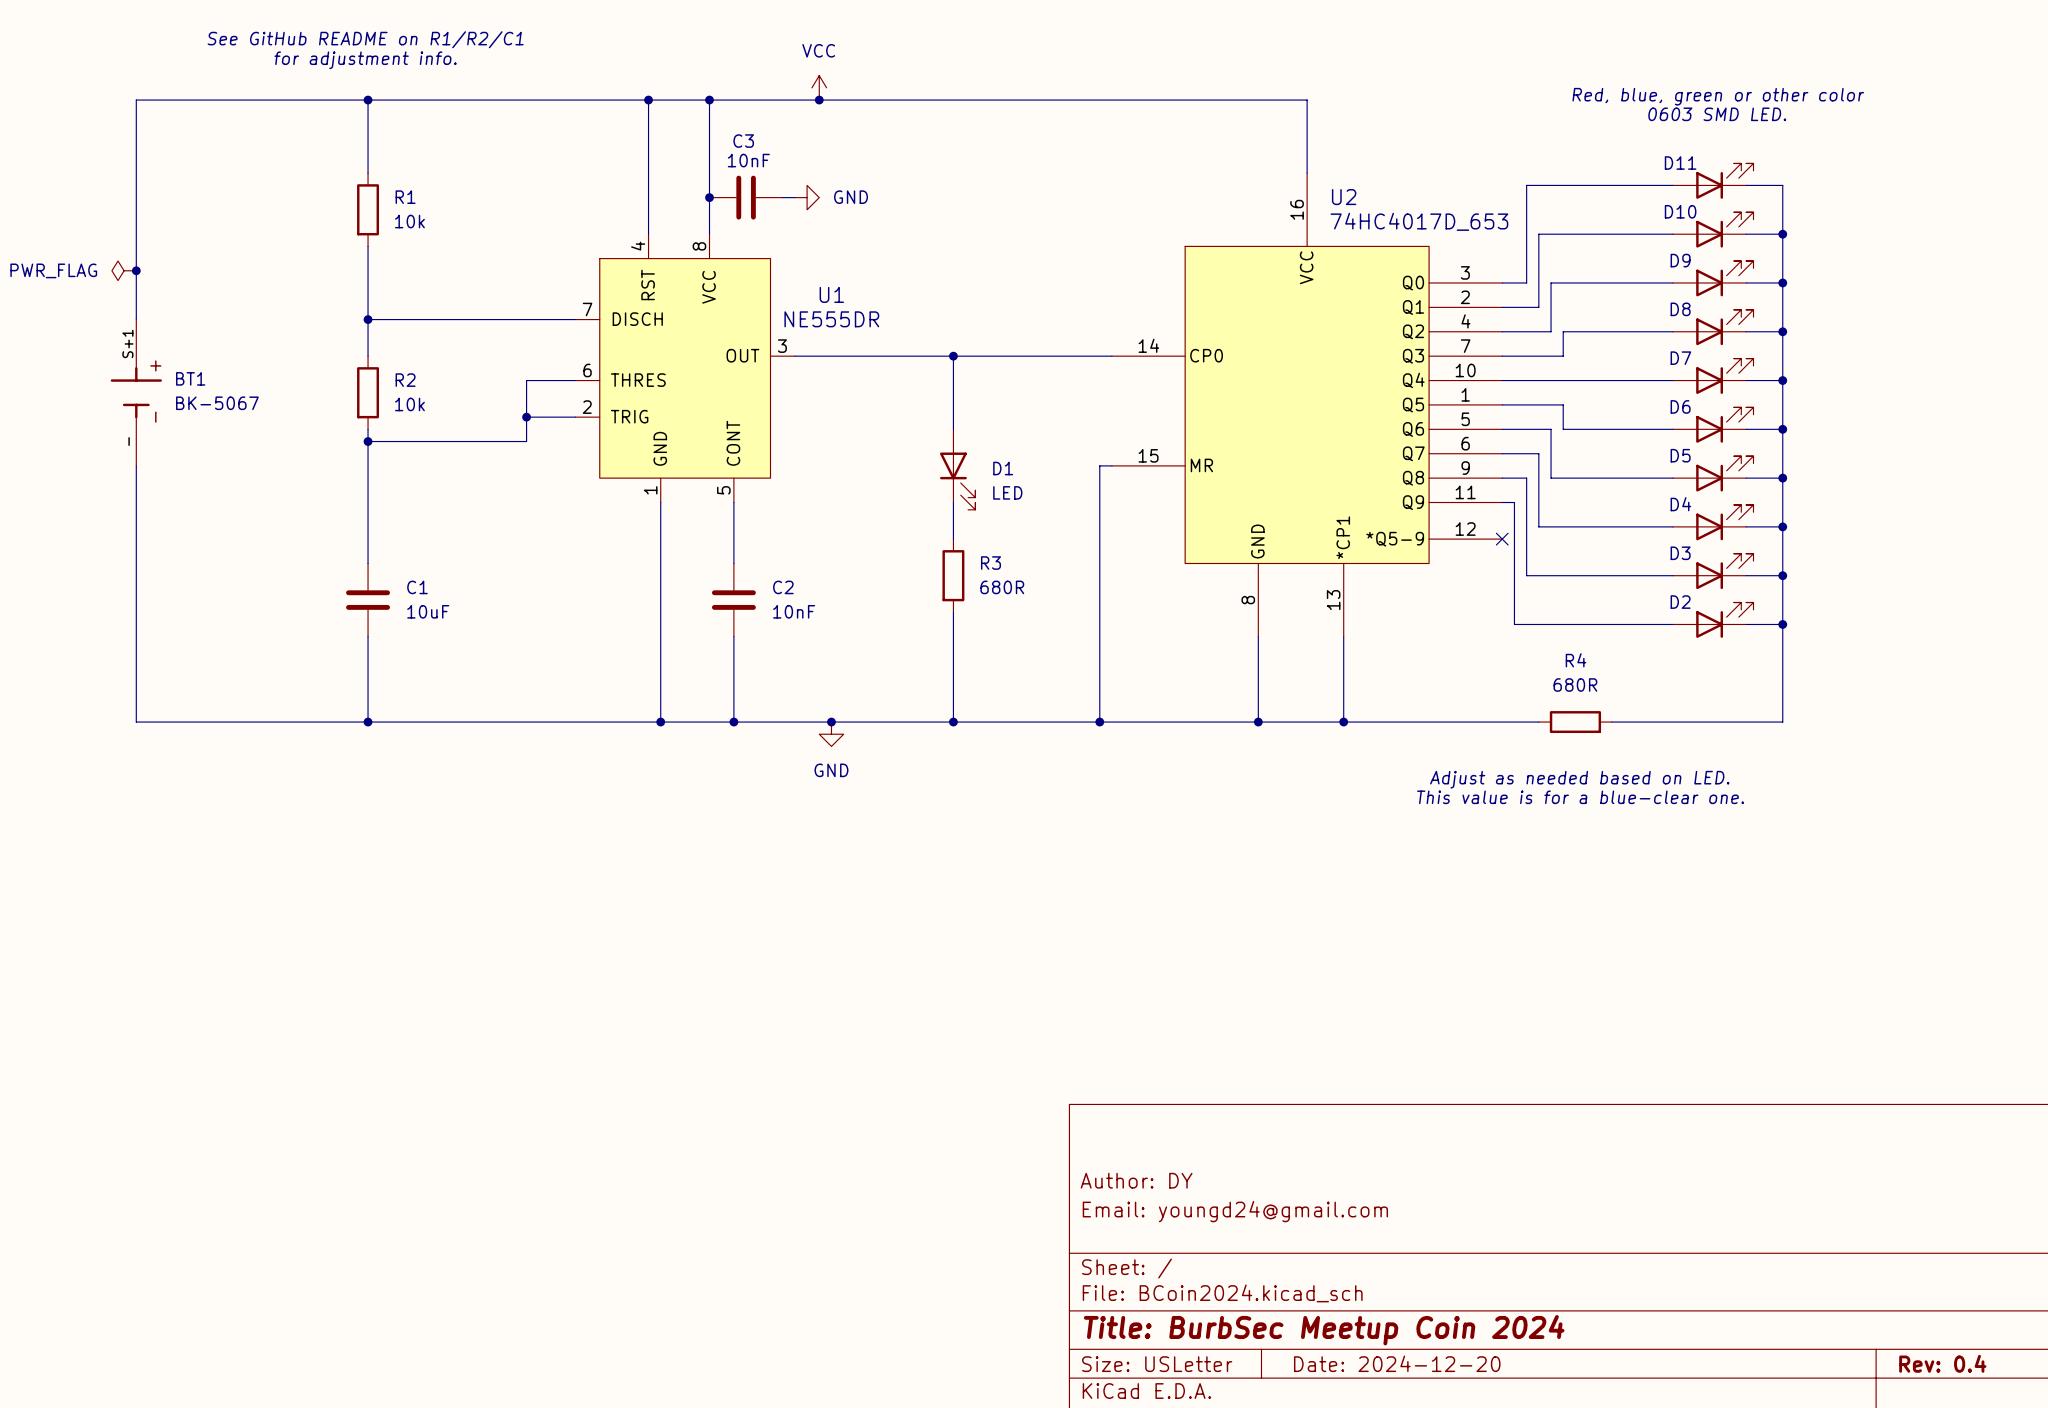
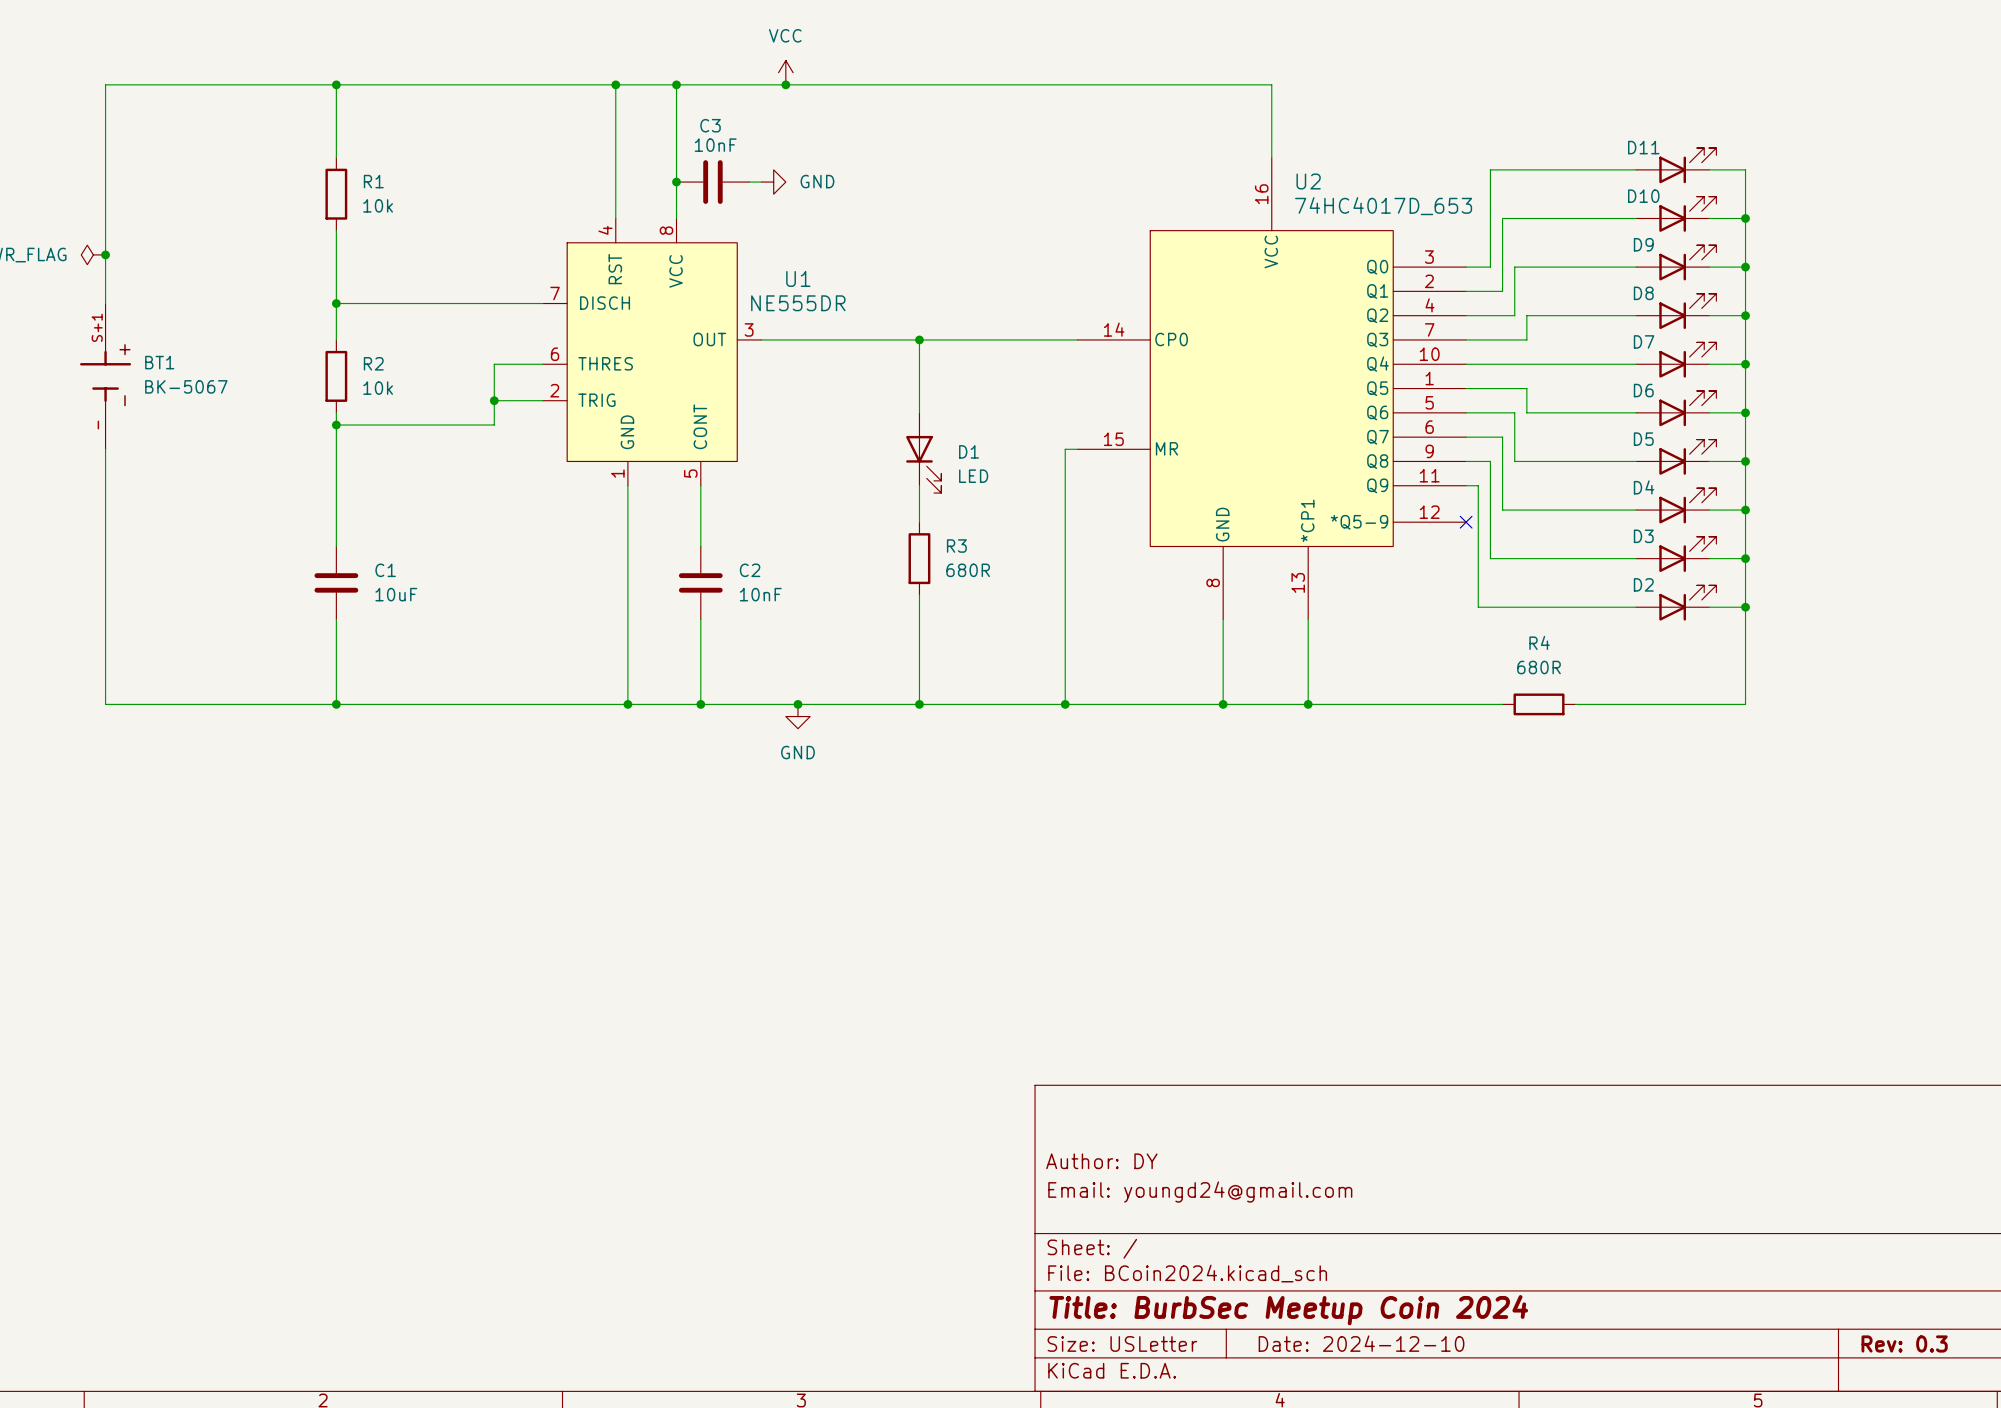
text: See GitHub README on R1/R2/C1 (365, 39) -> none
text: for adjustment info. (365, 60) -> none
text: Red, blue, green or other color (1718, 96) -> none
text: 0603 SMD LED. (1717, 114) -> none
text: Adjust as needed based on LED. (1579, 779) -> none
text: This value is for a blue-clear one. (1580, 797) -> none
title block: Date: 2024-12-20 (1397, 1363) -> Date: 2024-12-10 (1361, 1343)
title block: Rev: 0.4 (1942, 1363) -> Rev: 0.3 (1904, 1343)

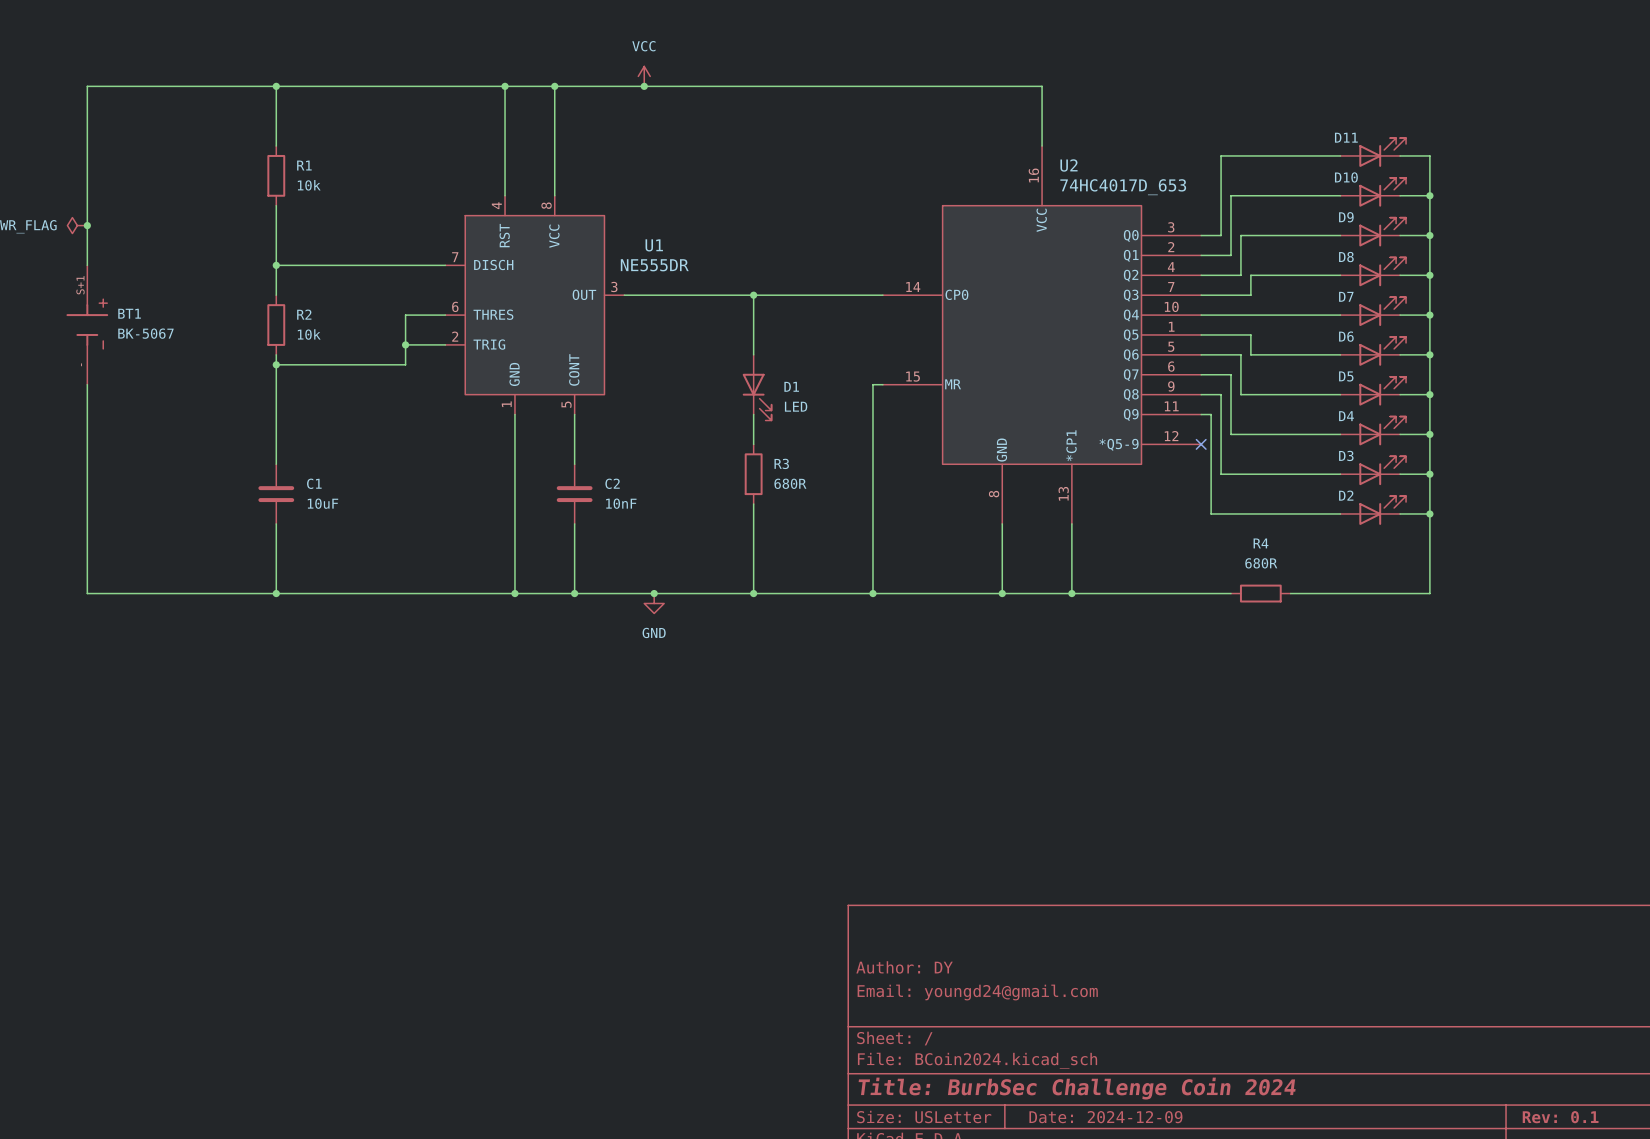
junction: (676, 182) -> none
C3: 10nF (712, 182) -> none
wire: (749, 182) (761, 182) -> none
power symbol: GND (773, 182) -> none
title block: Title: BurbSec Meetup Coin 2024 (1288, 1310) -> Title: BurbSec Challenge Coin 2024 (1077, 1088)
title block: Date: 2024-12-10 (1361, 1343) -> Date: 2024-12-09 (1105, 1117)
title block: Rev: 0.3 (1904, 1343) -> Rev: 0.1 (1560, 1117)

